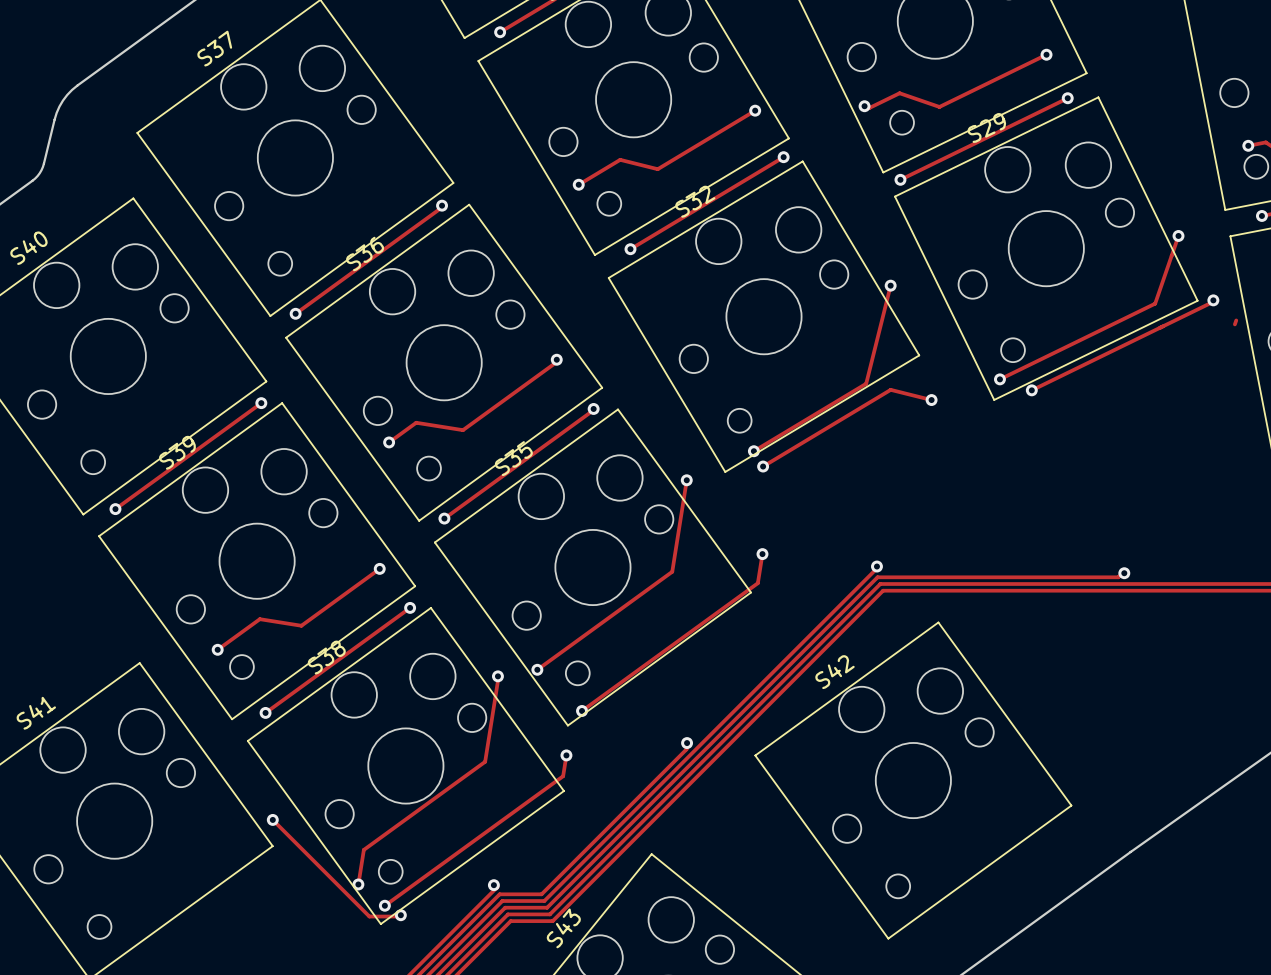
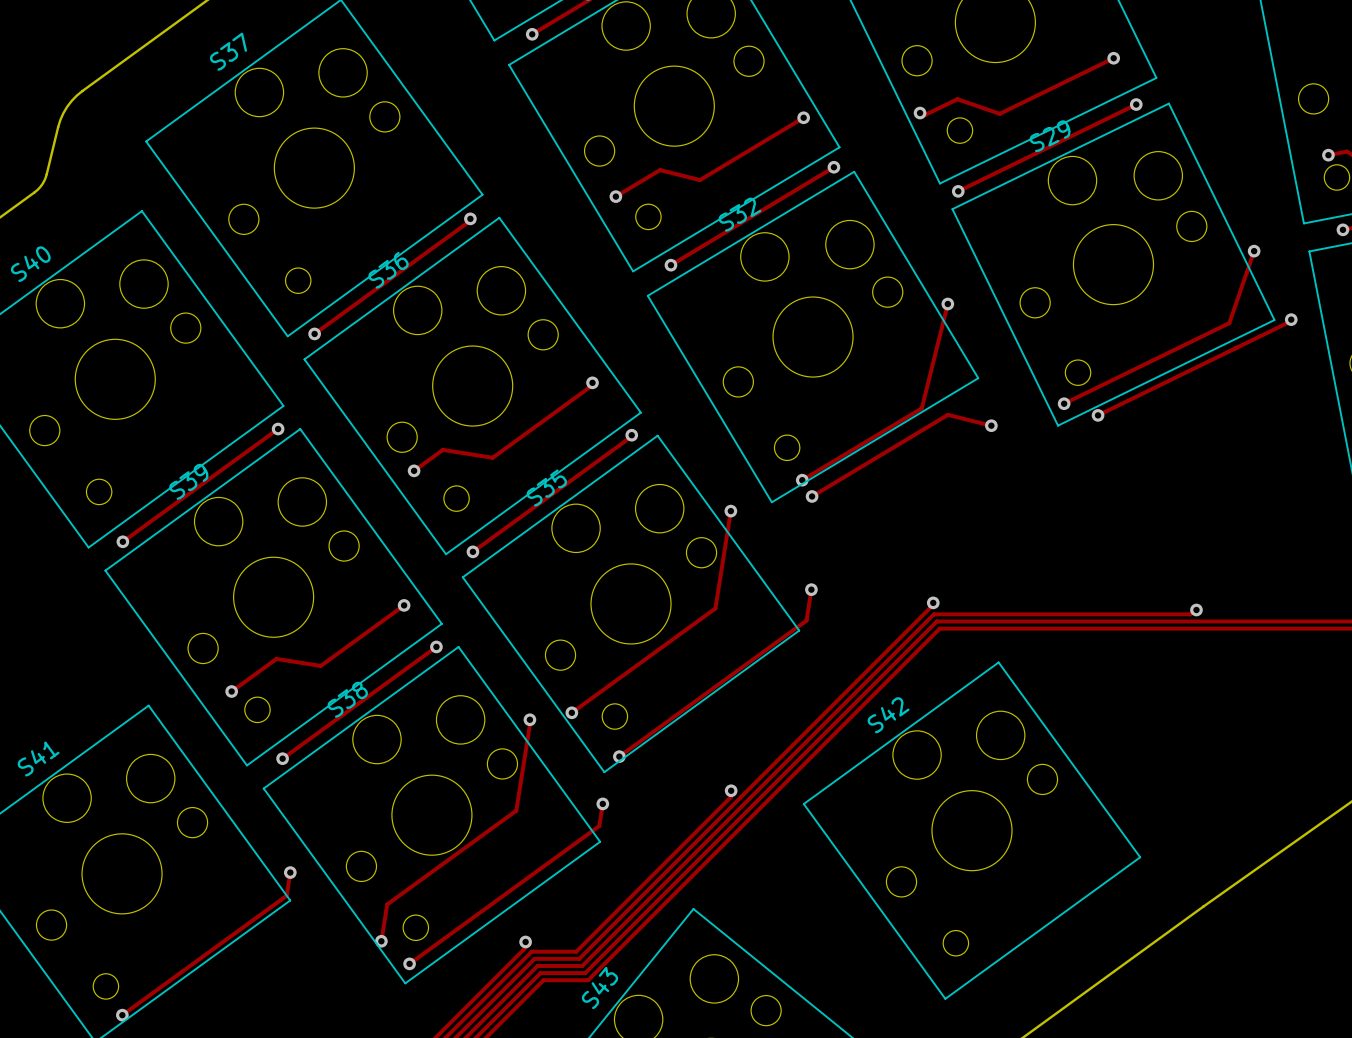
track: (1236, 320) (1234, 324) -> none
track: (272, 819) (369, 916) (400, 915) -> (290, 872) (286, 895) (122, 1015)
via: (400, 915) -> none
via: none -> (122, 1015)

